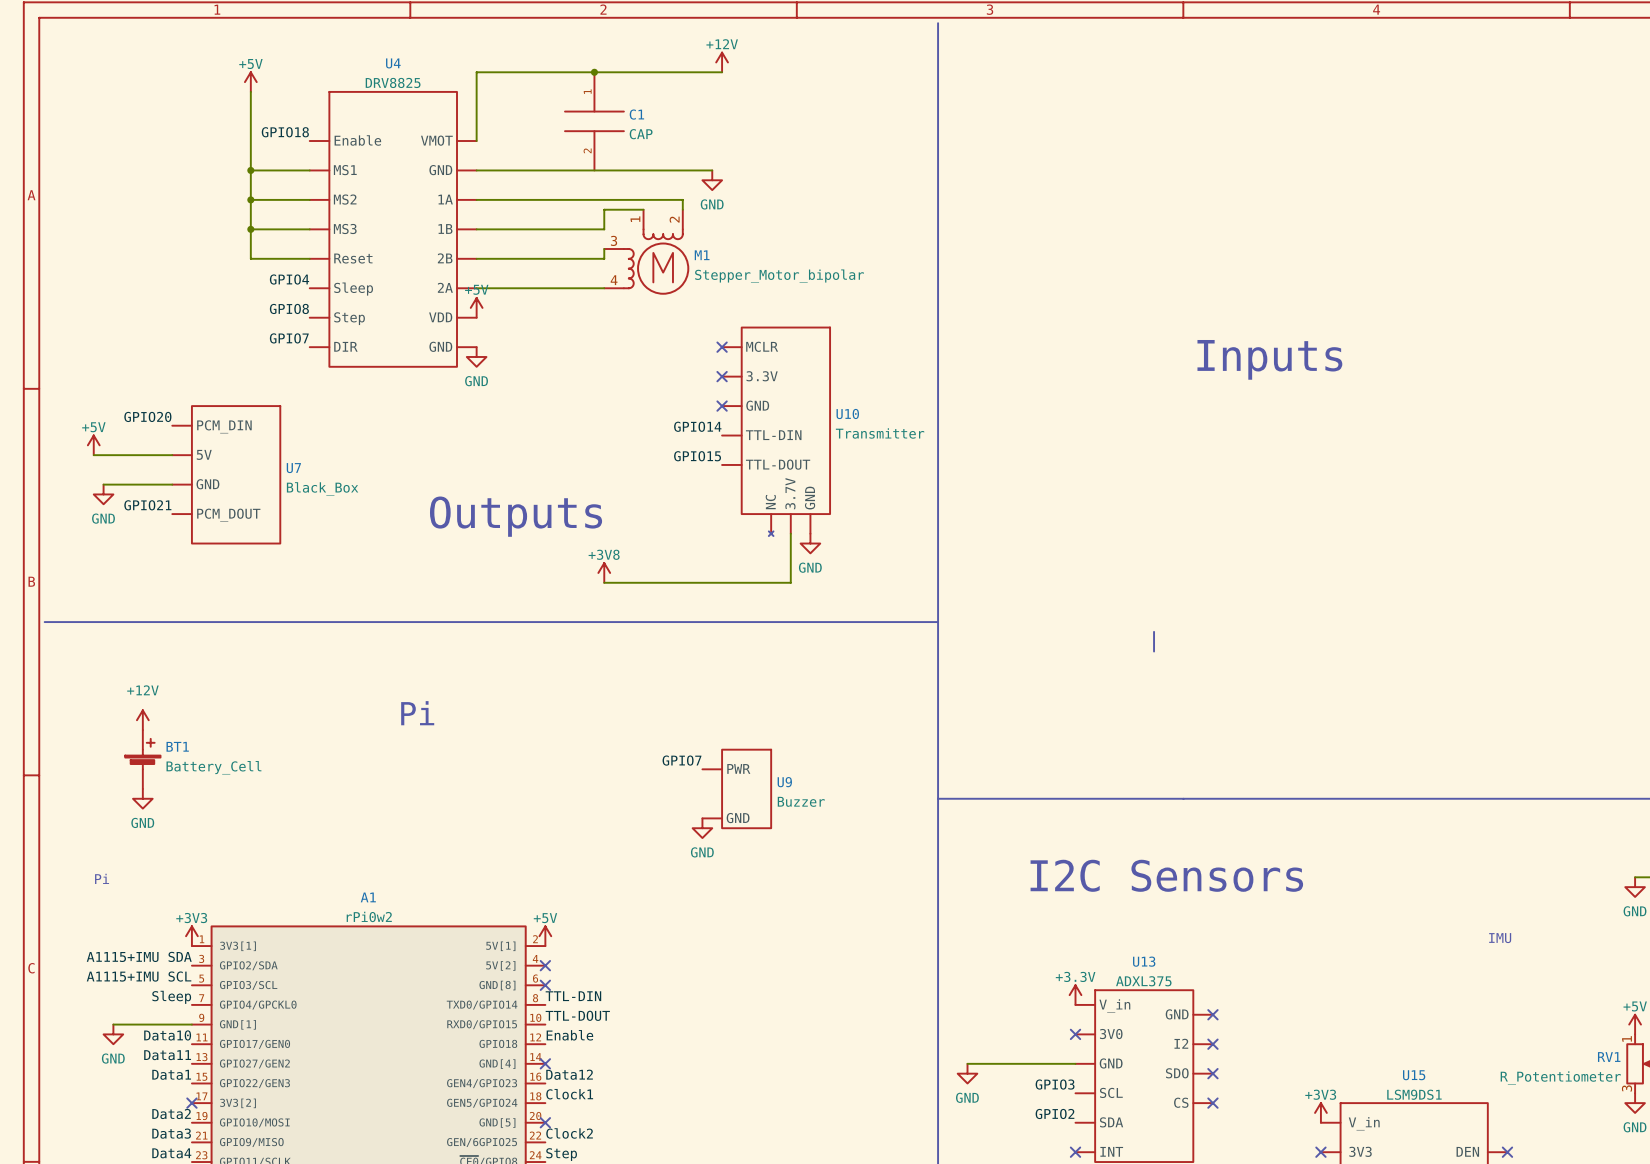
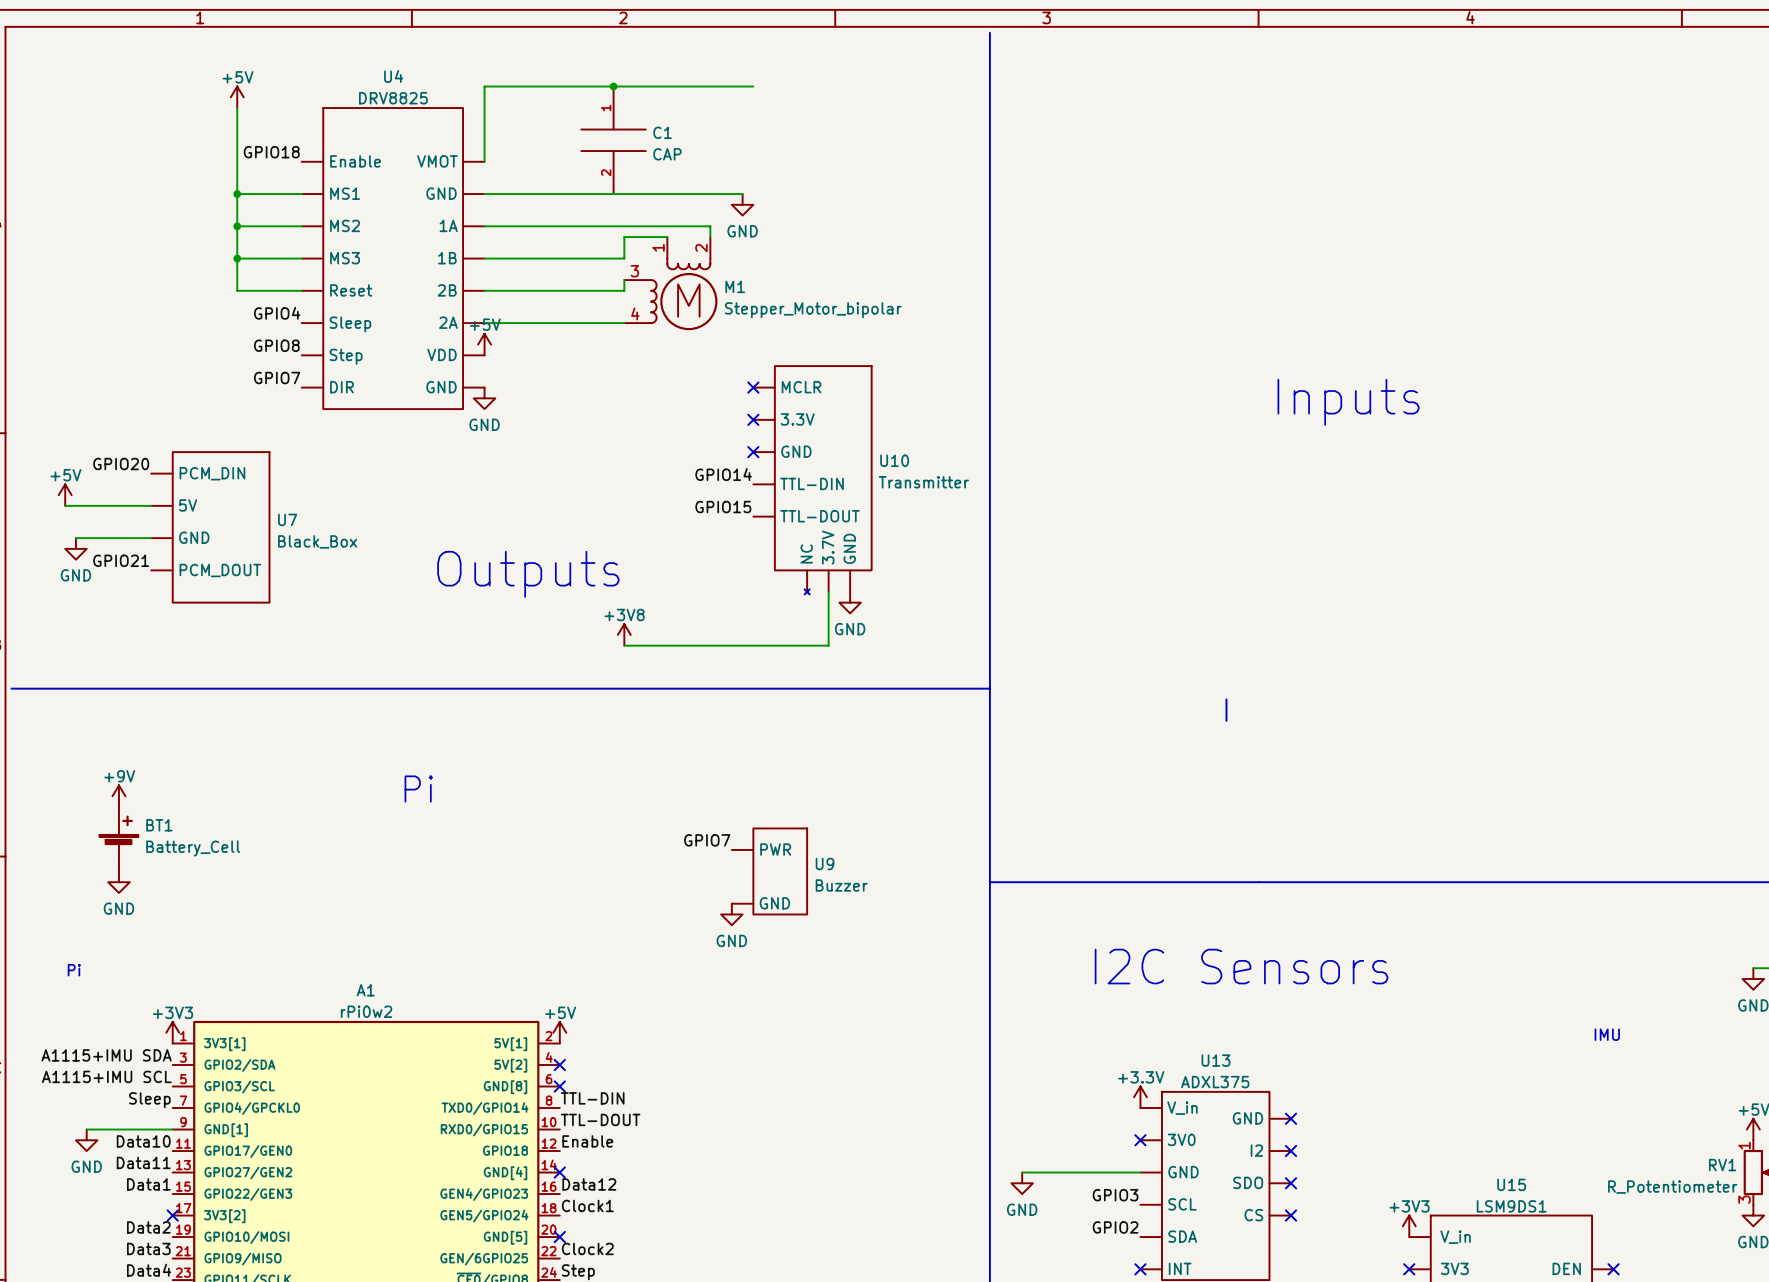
power symbol: +12V (722, 62) -> none
power symbol: +12V (142, 720) -> +9V (118, 796)

